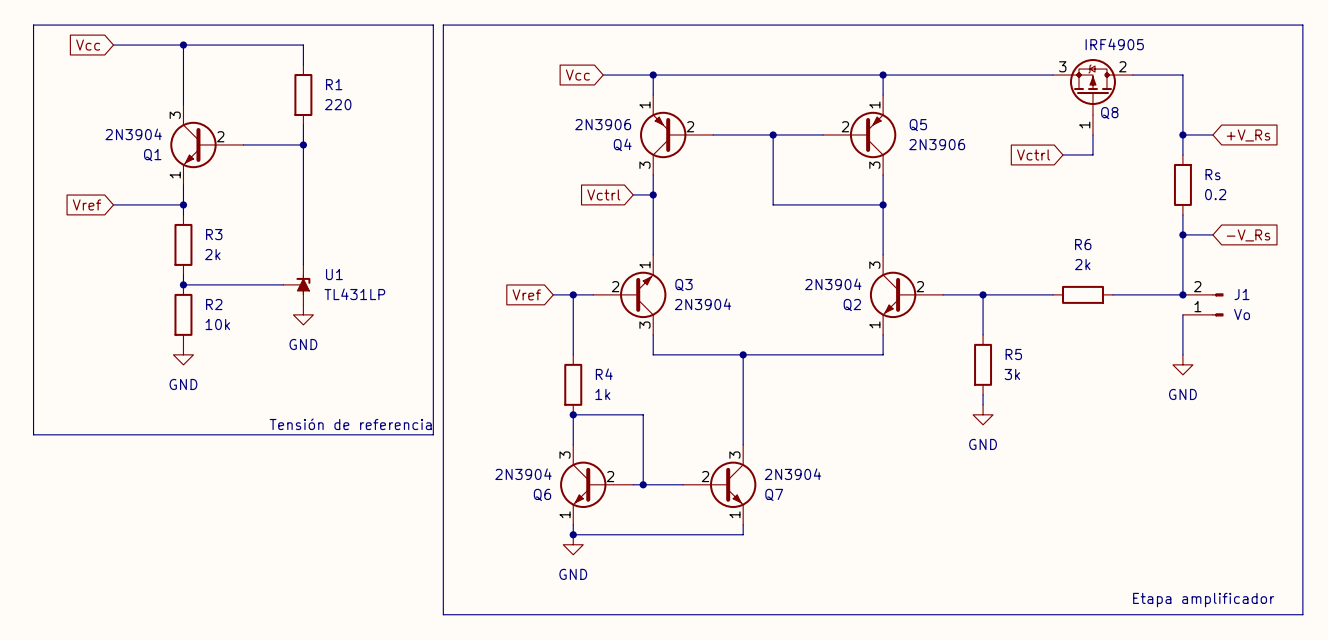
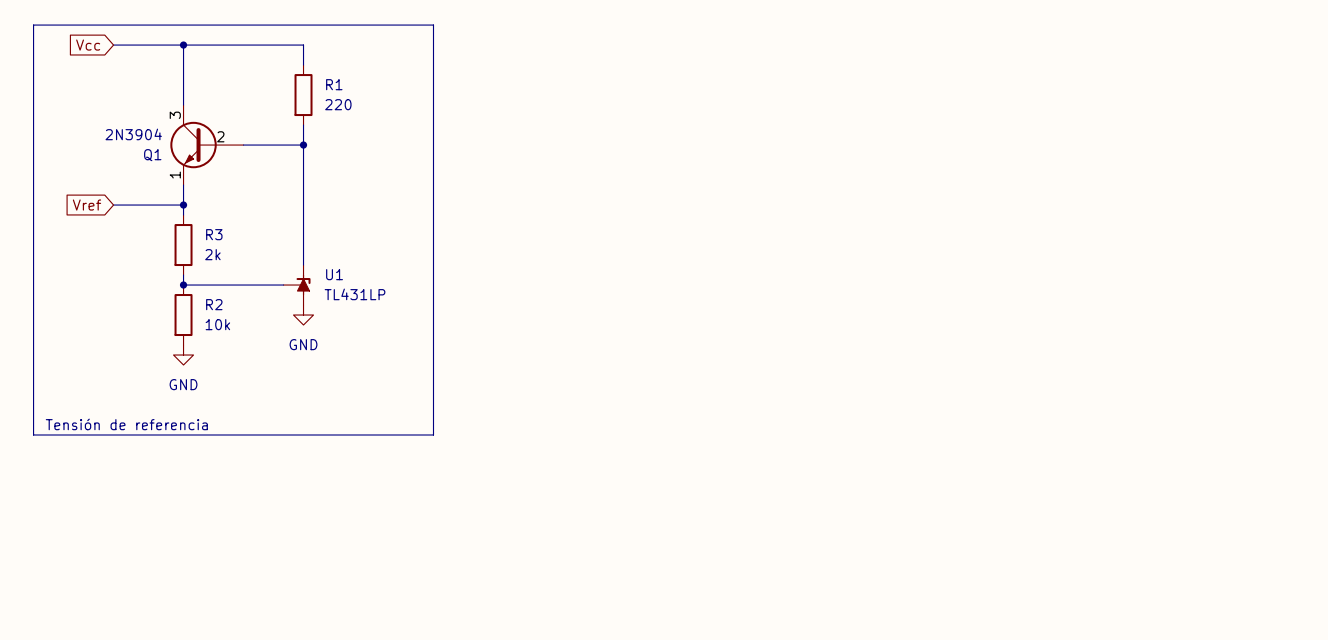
line: (443, 25) (1302, 25) (1302, 614) (443, 614) (443, 25) -> none
global label: Vcc (577, 75) -> none
wire: (603, 75) (1053, 75) -> none
wire: (653, 75) (653, 95) -> none
junction: (653, 75) -> none
wire: (883, 75) (883, 95) -> none
junction: (883, 75) -> none
wire: (1132, 75) (1182, 75) (1182, 154) -> none
Q8: IRF4905 (1092, 97) -> none
Q4: 2N3906 (676, 134) -> none
wire: (713, 134) (823, 134) -> none
wire: (773, 134) (773, 204) (883, 204) -> none
junction: (773, 134) -> none
Q5: 2N3906 (859, 134) -> none
wire: (1092, 134) (1092, 154) (1063, 154) -> none
wire: (1182, 134) (1212, 134) -> none
junction: (1182, 134) -> none
global label: +V_Rs (1248, 135) -> none
global label: Vctrl (1033, 154) -> none
wire: (653, 174) (653, 254) -> none
wire: (883, 174) (883, 254) -> none
Rs: 0.2 (1182, 184) -> none
global label: Vctrl (603, 194) -> none
wire: (633, 194) (653, 194) -> none
junction: (653, 194) -> none
junction: (883, 204) -> none
wire: (1182, 214) (1182, 294) (1112, 294) -> none
wire: (1182, 234) (1212, 234) -> none
junction: (1182, 234) -> none
global label: -V_Rs (1248, 235) -> none
global label: Vref (526, 294) -> none
wire: (553, 294) (593, 294) -> none
wire: (573, 294) (573, 354) -> none
junction: (573, 294) -> none
Q3: 2N3904 (629, 294) -> none
Q2: 2N3904 (906, 294) -> none
wire: (943, 294) (1053, 294) -> none
wire: (983, 294) (983, 334) -> none
junction: (983, 294) -> none
R6: 2k (1082, 294) -> none
junction: (1182, 294) -> none
J1: Vo (1203, 304) -> none
wire: (1182, 314) (1182, 354) -> none
wire: (653, 334) (653, 354) (883, 354) (883, 334) -> none
wire: (743, 354) (743, 444) -> none
junction: (743, 354) -> none
R5: 3k (983, 364) -> none
power symbol: GND (1182, 364) -> none
R4: 1k (573, 384) -> none
wire: (983, 394) (983, 404) -> none
junction: (573, 414) -> none
power symbol: GND (983, 414) -> none
text: none -> Tensión de referencia (126, 424)
text: Tensión de referencia (350, 424) -> none
wire: (573, 444) (573, 414) (643, 414) (643, 484) -> none
Q6: 2N3904 (596, 484) -> none
wire: (633, 484) (683, 484) -> none
junction: (643, 484) -> none
Q7: 2N3904 (719, 484) -> none
wire: (573, 524) (573, 534) (743, 534) (743, 524) -> none
junction: (573, 534) -> none
power symbol: GND (573, 544) -> none
text: Etapa amplificador (1203, 600) -> none

